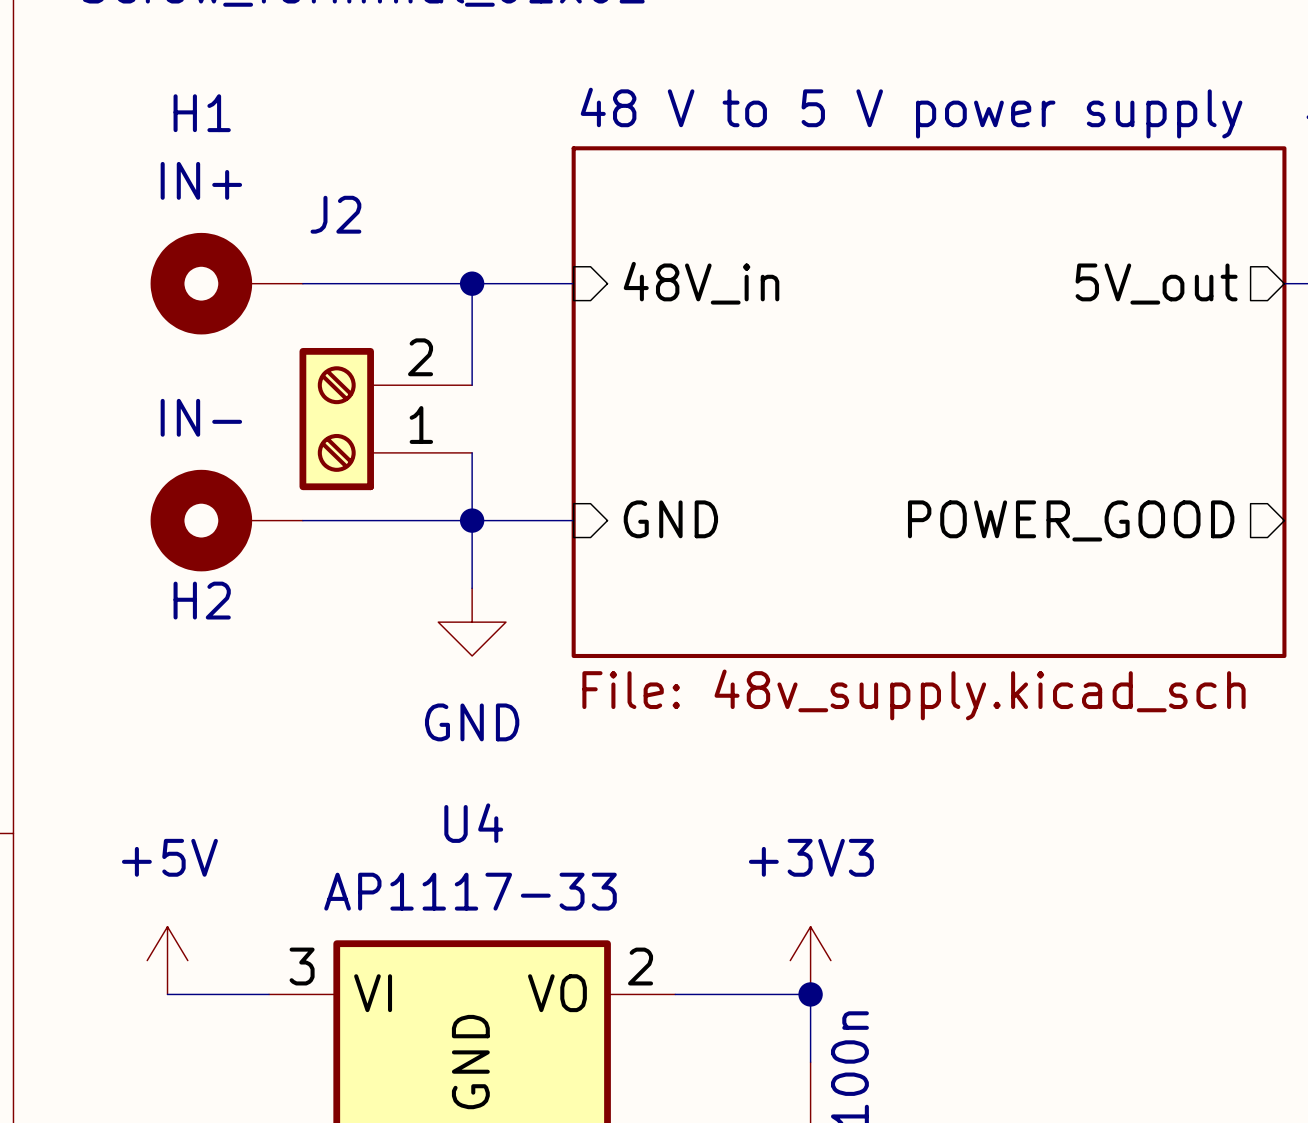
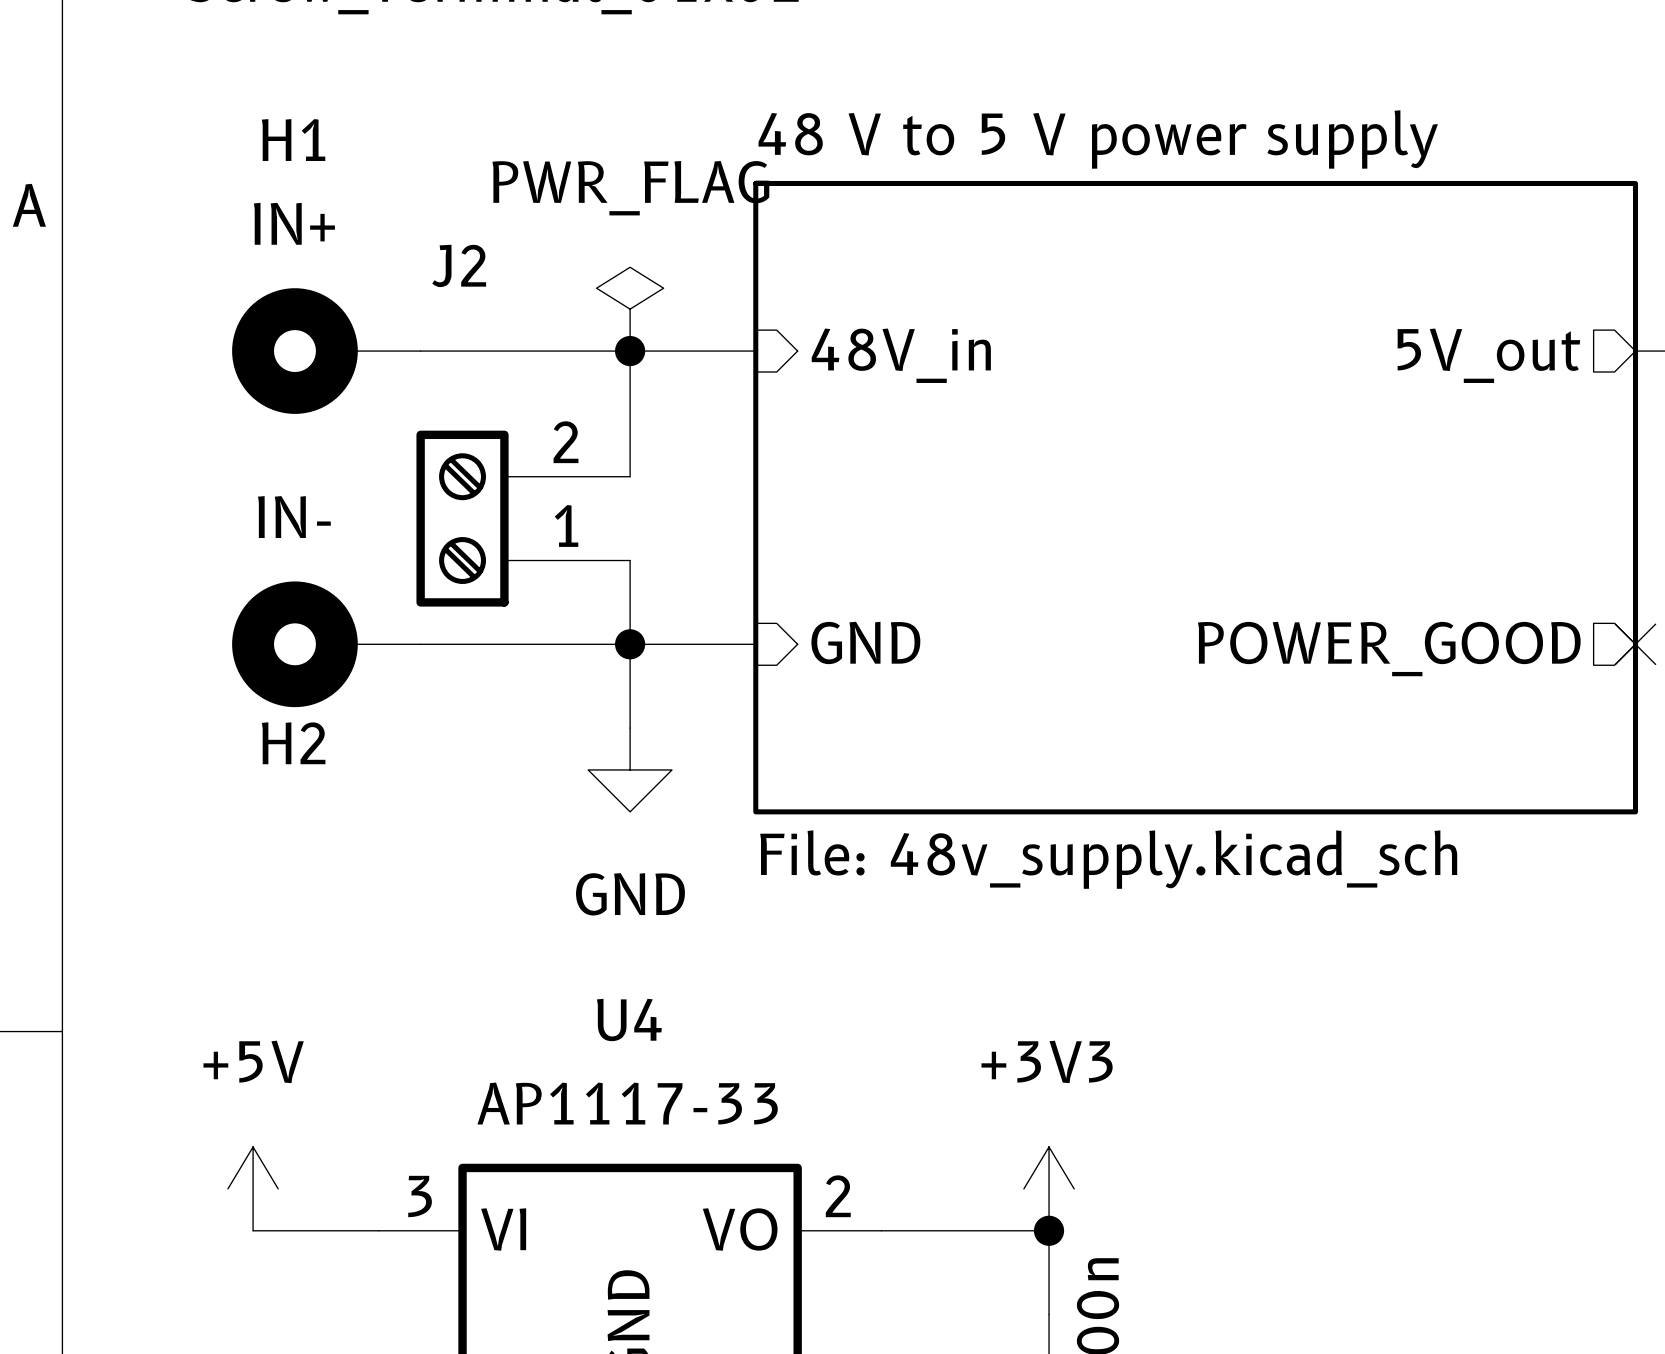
power symbol: none -> PWR_FLAG (630, 309)
no-connect mark: none -> (1635, 644)

